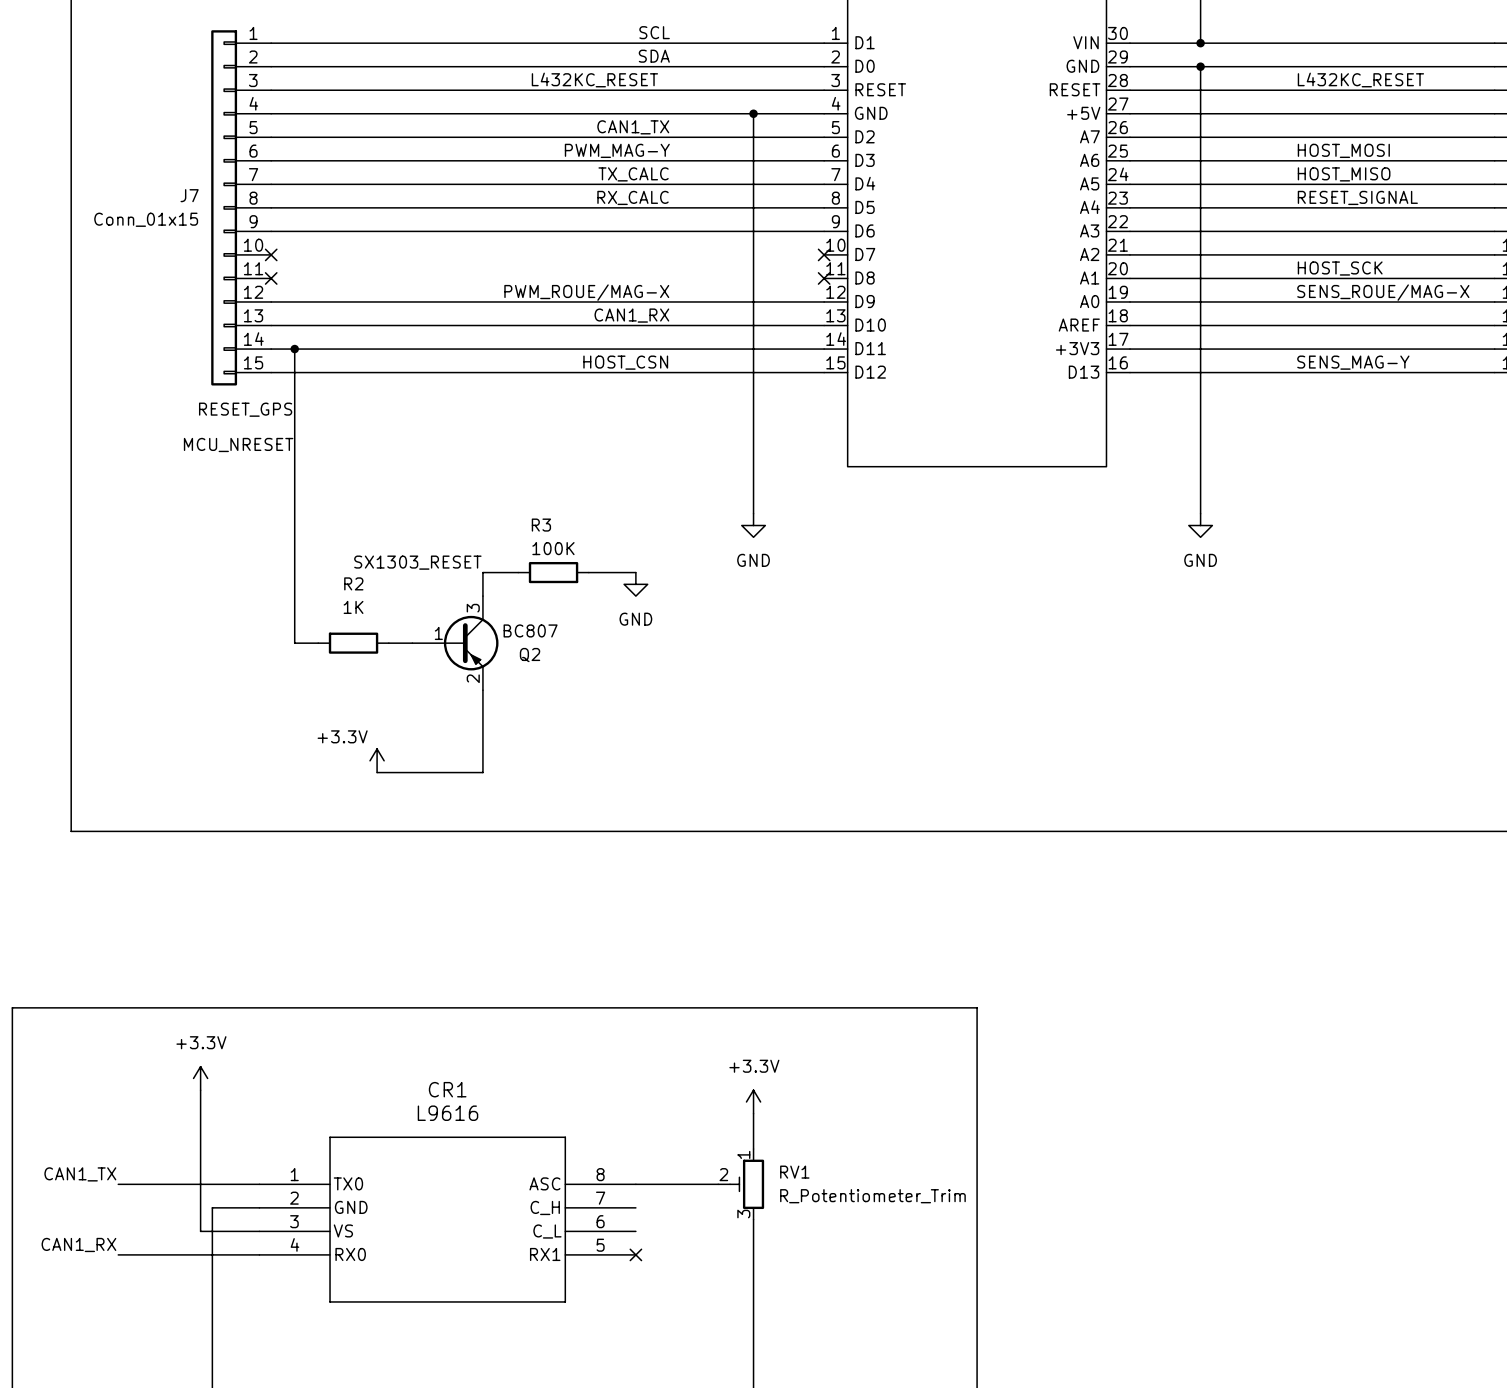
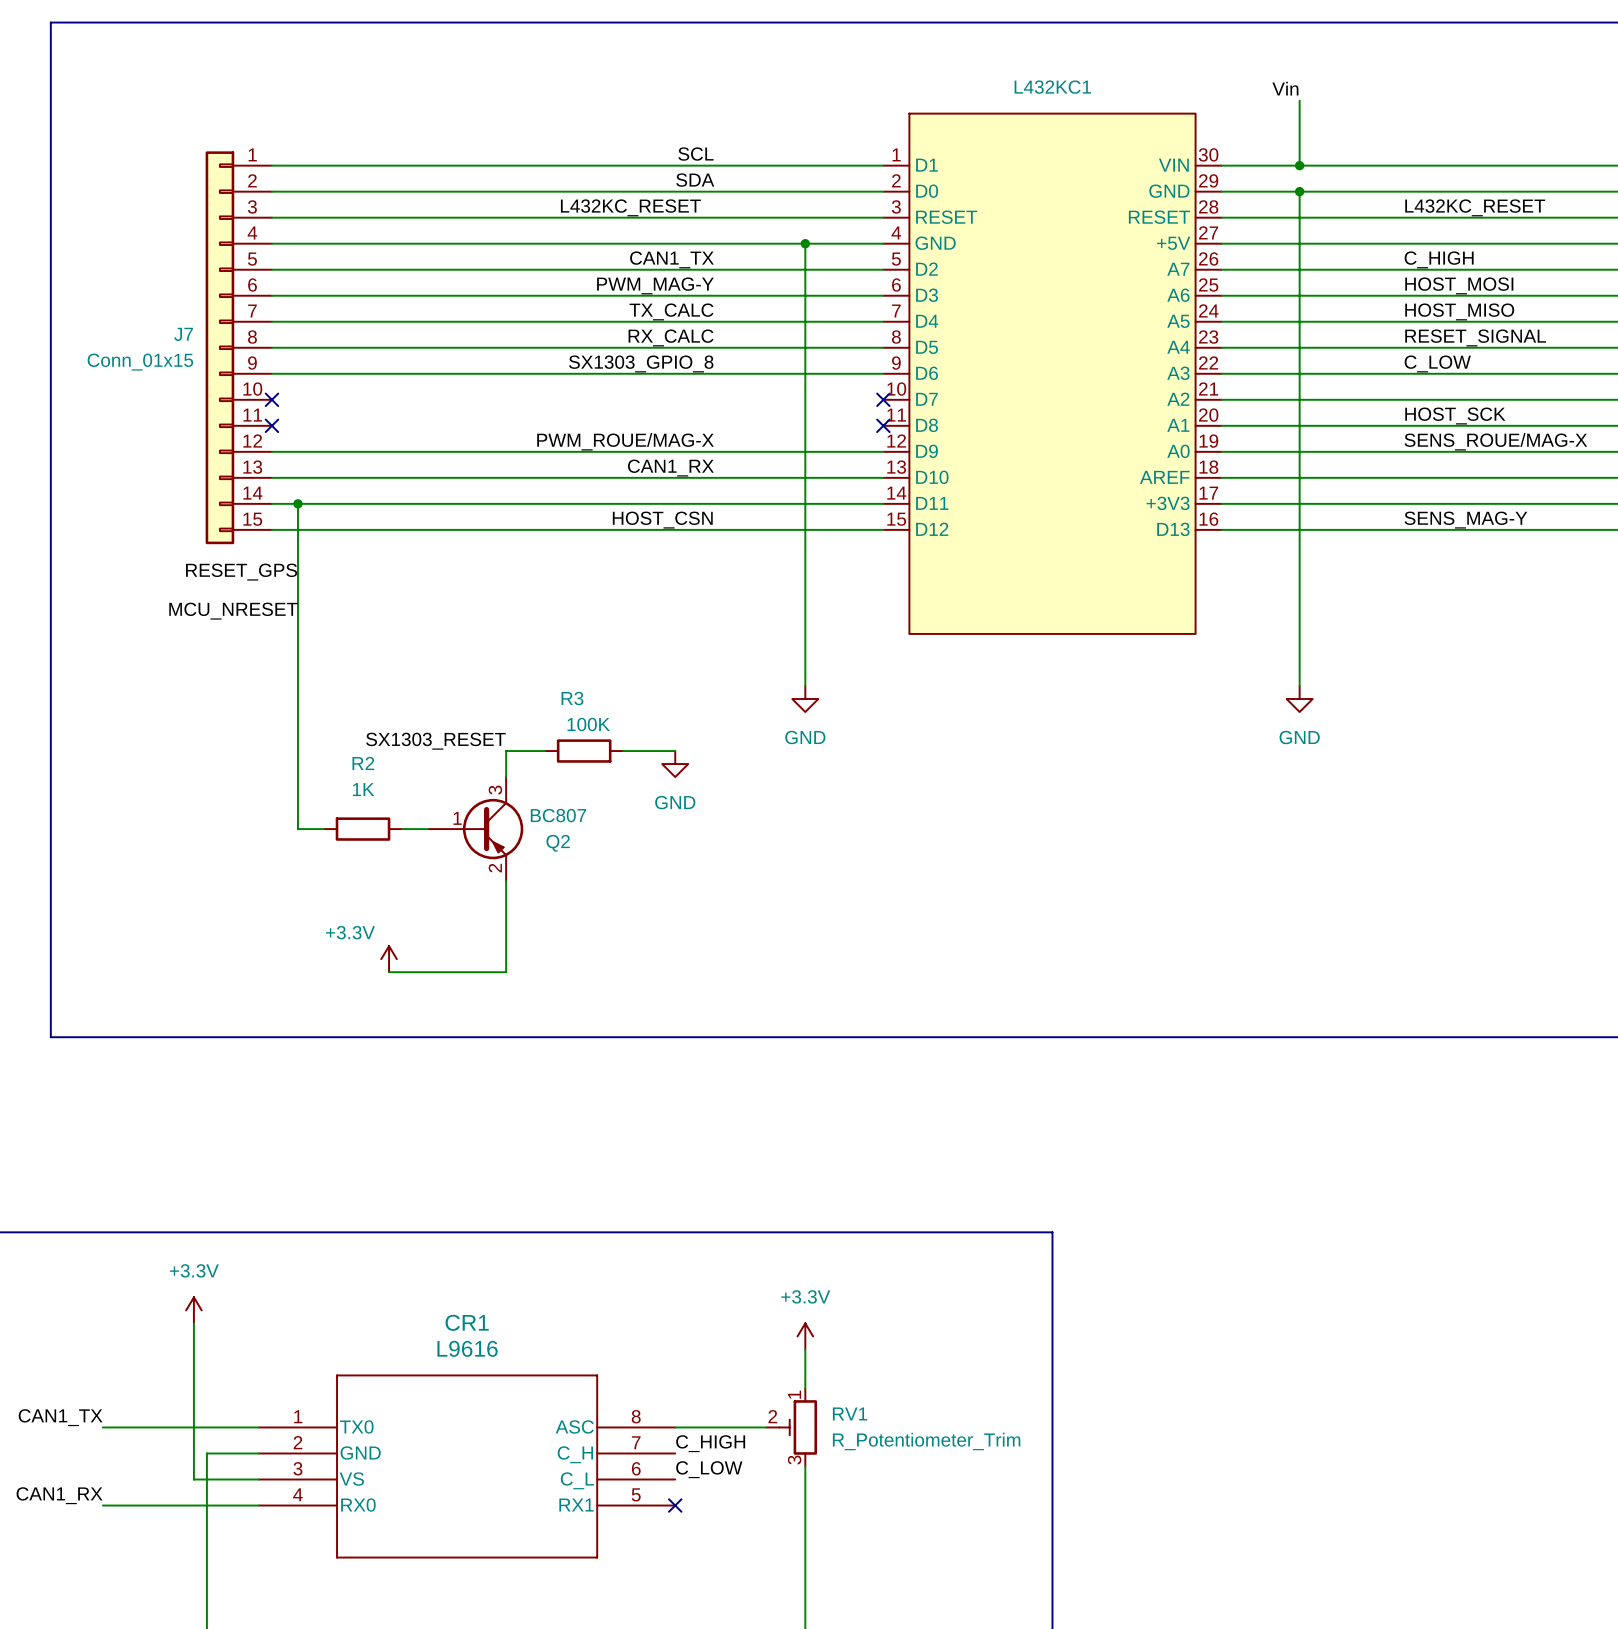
label: none -> C_HIGH (1439, 259)
label: none -> SX1303_GPIO_8 (641, 363)
label: none -> C_LOW (1437, 363)
label: none -> C_HIGH (710, 1443)
label: none -> C_LOW (709, 1469)

